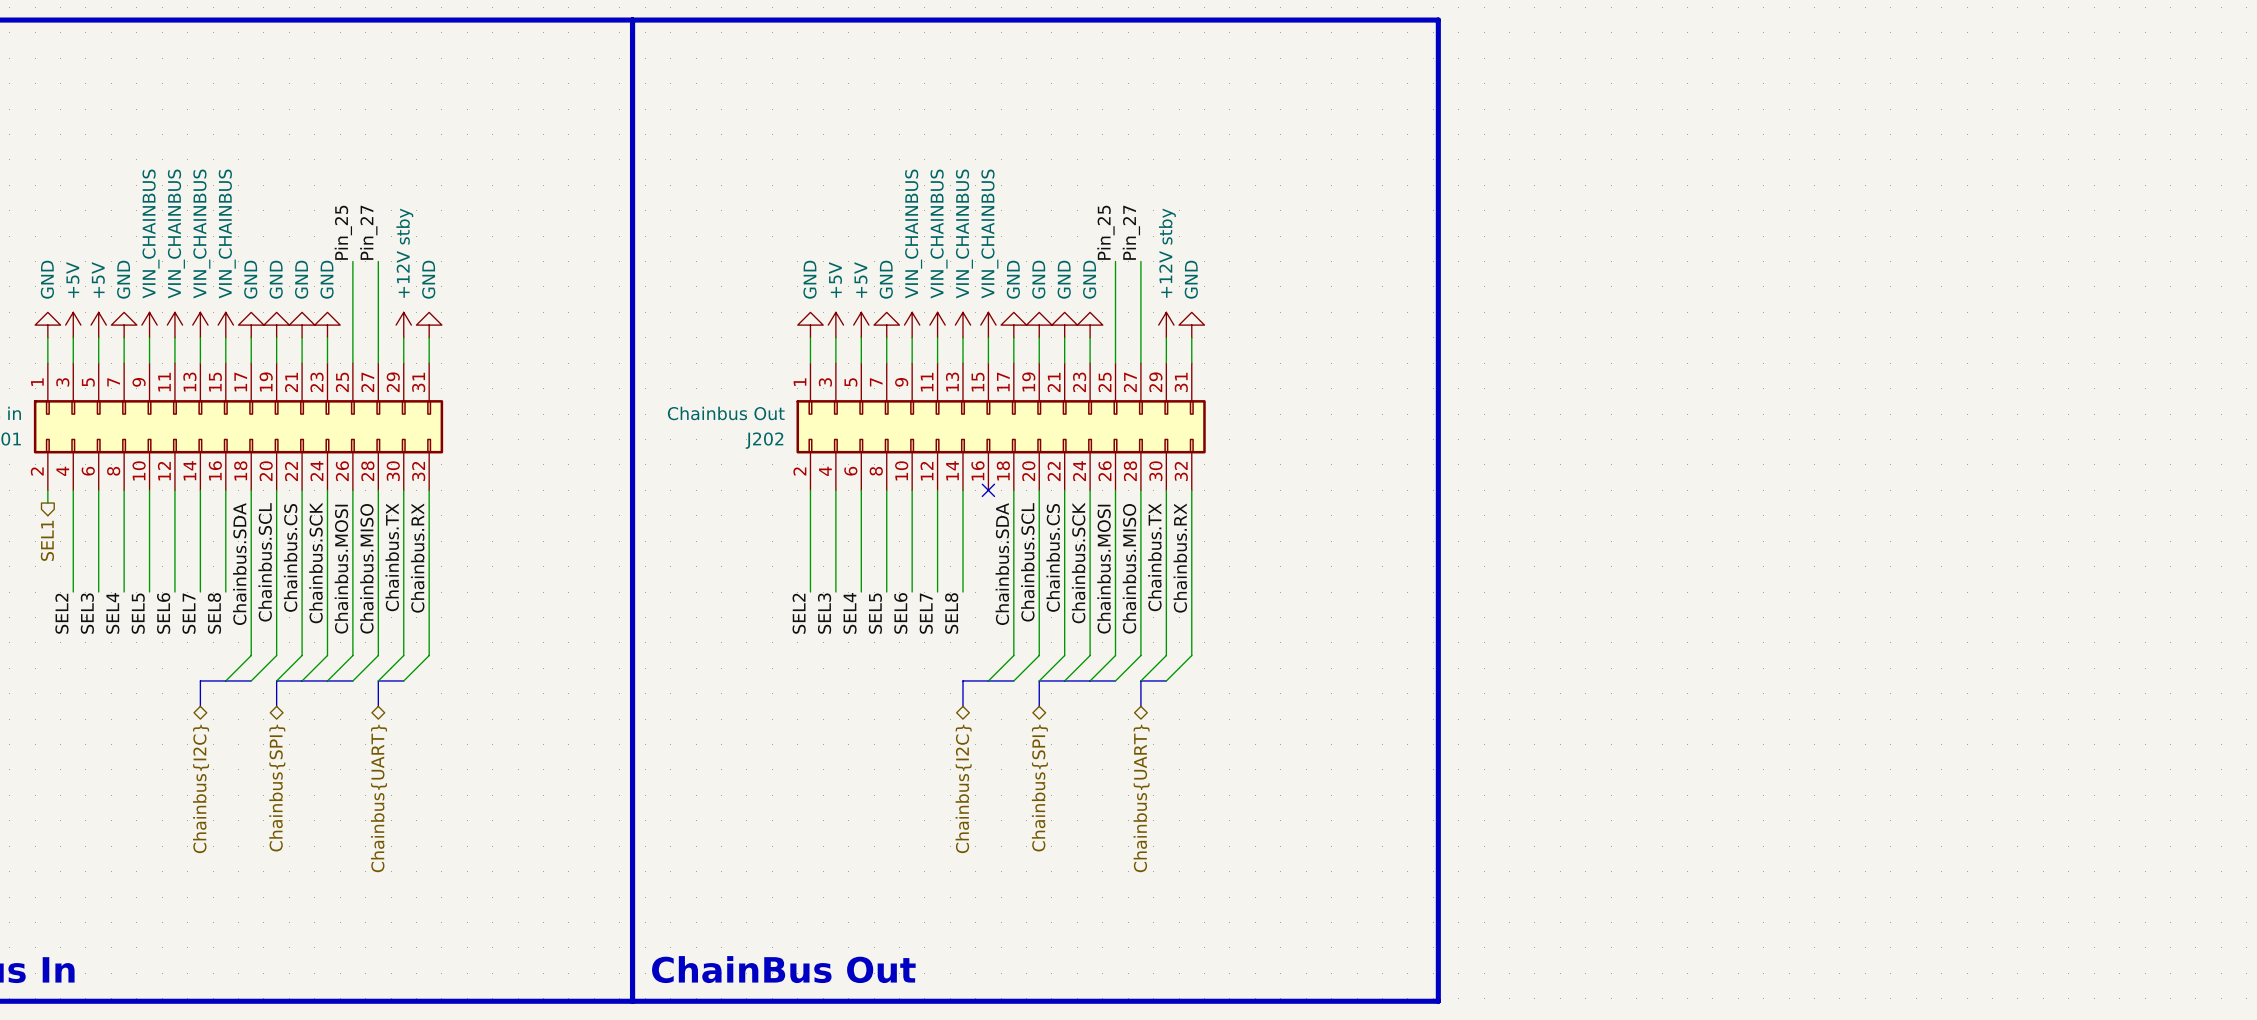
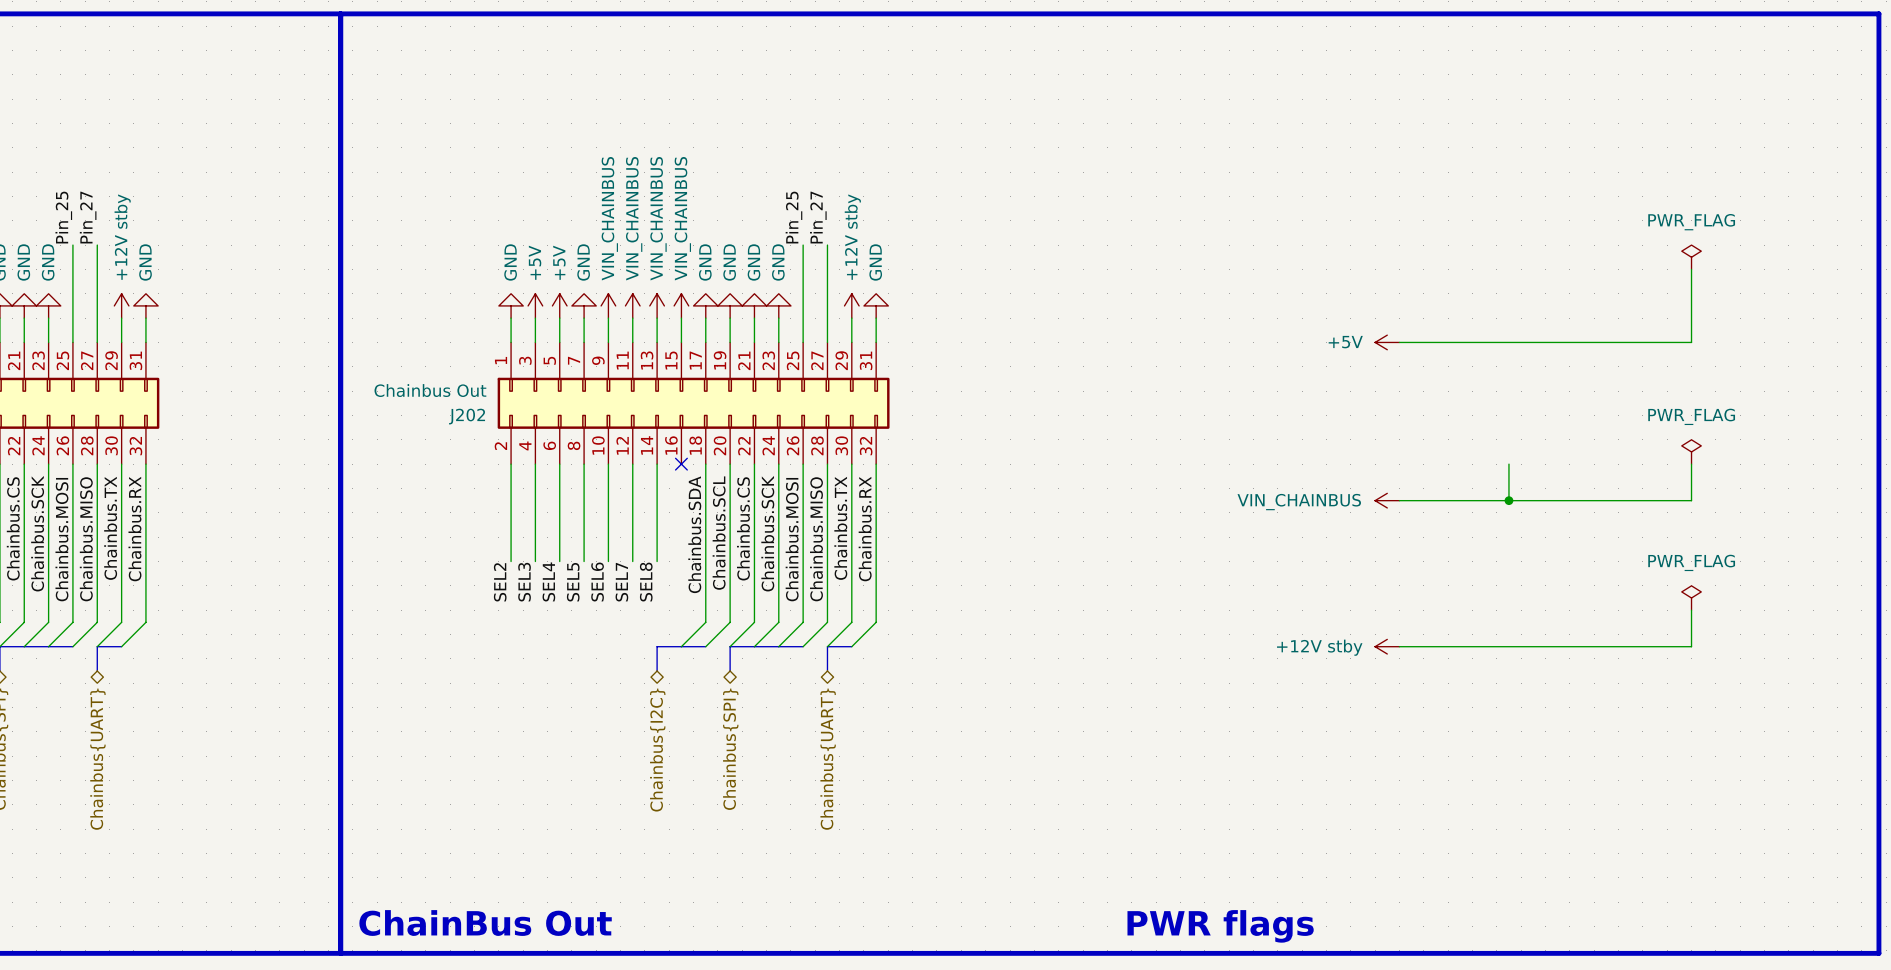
line: (1438, 20) (1438, 1001) -> (1112, 13) (1878, 13) (1878, 953) (1112, 953)
power symbol: none -> PWR_FLAG (1691, 257)
wire: none -> (1691, 269) (1691, 342) (1399, 342)
power symbol: none -> +5V (1387, 342)
power symbol: none -> PWR_FLAG (1691, 451)
wire: none -> (1508, 464) (1508, 500)
wire: none -> (1691, 464) (1691, 500) (1399, 500)
power symbol: none -> VIN_CHAINBUS (1387, 500)
junction: none -> (1508, 500)
power symbol: none -> PWR_FLAG (1691, 598)
wire: none -> (1691, 610) (1691, 646) (1399, 646)
power symbol: none -> +12V stby (1387, 646)
text: none -> PWR flags (1220, 926)

